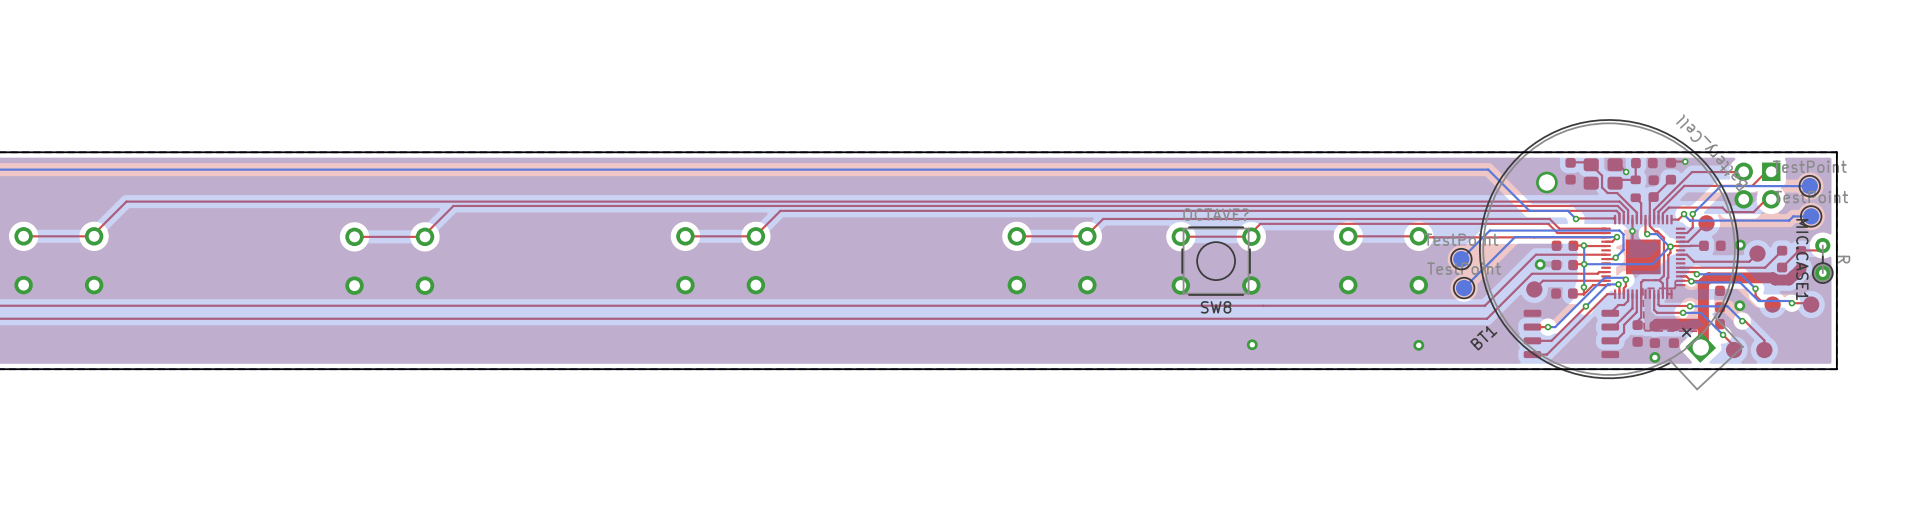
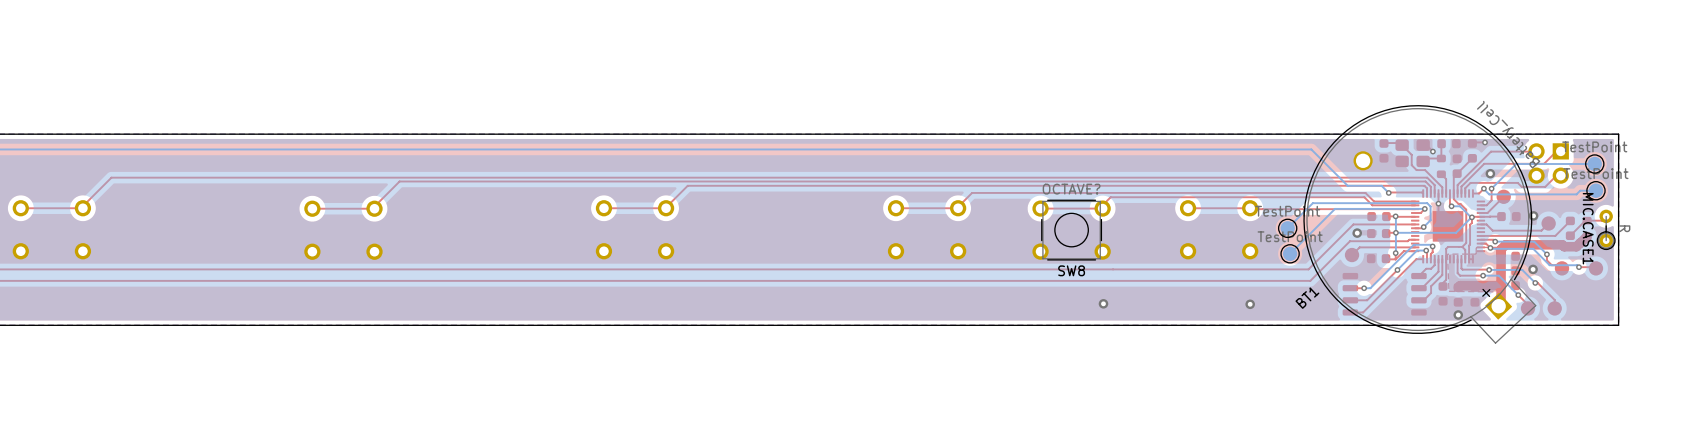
via: none -> (1490, 173)

